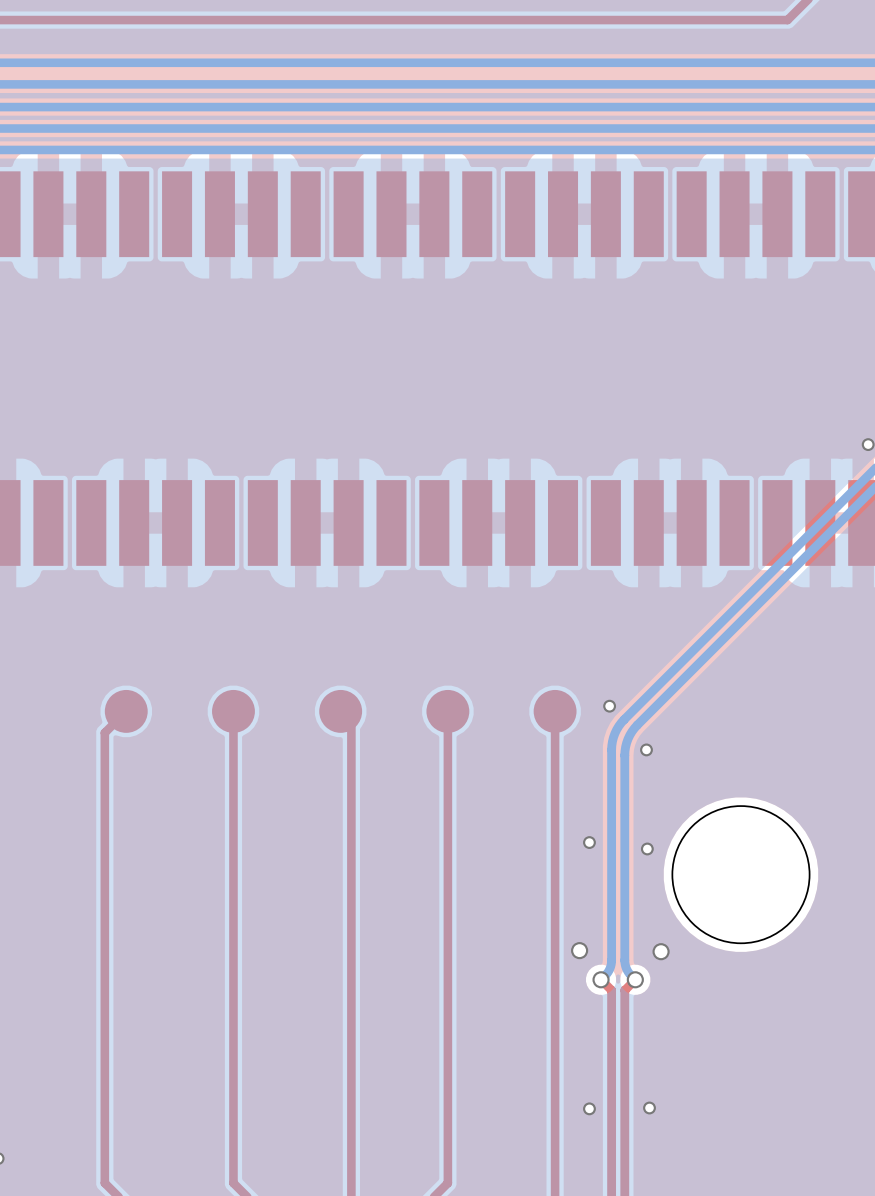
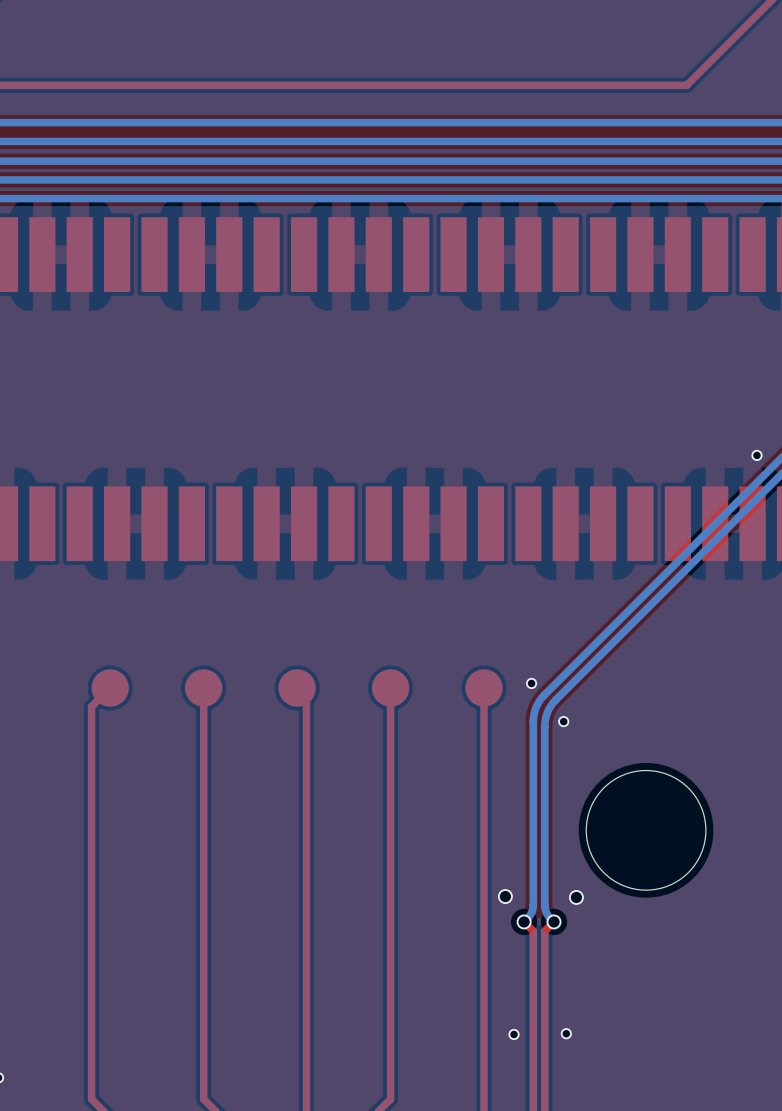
via: (589, 842) -> none
via: (647, 848) -> none

